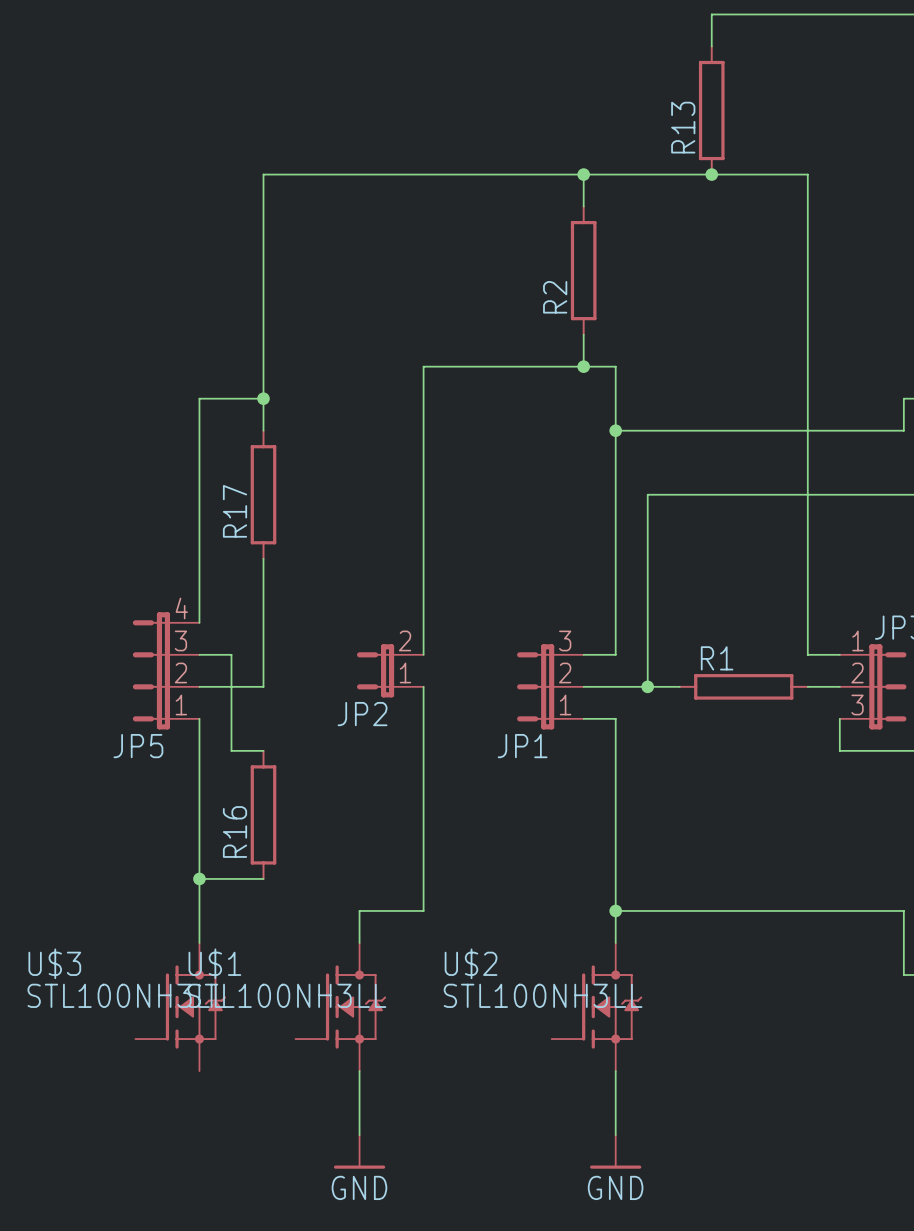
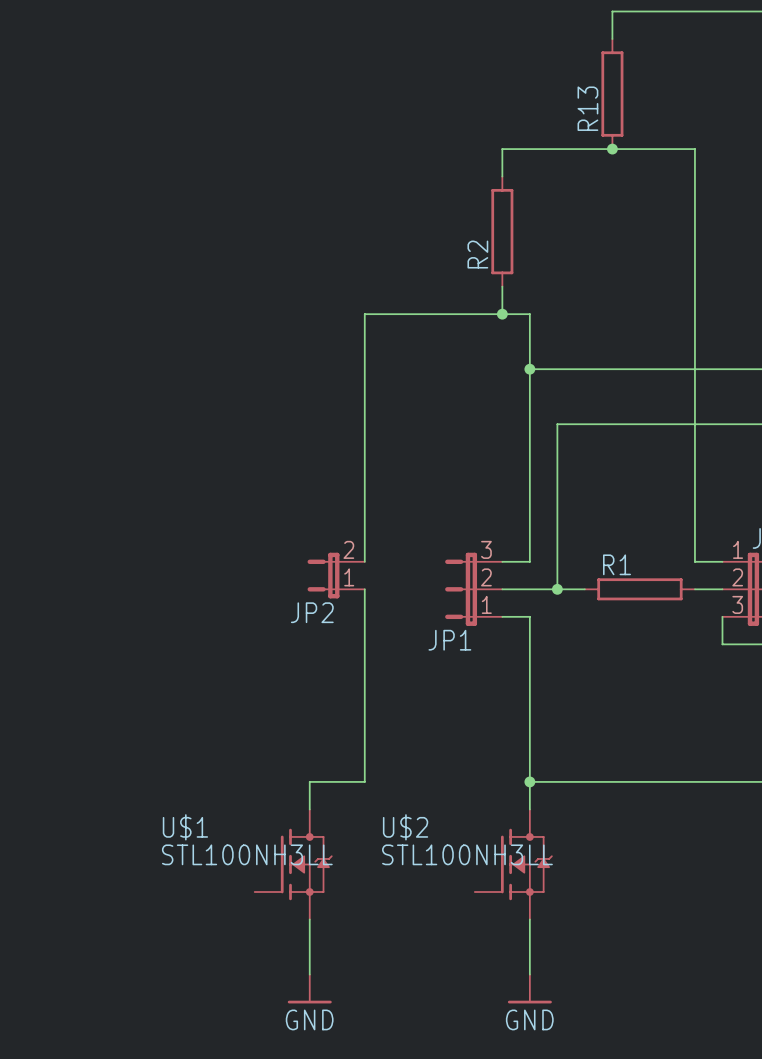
wire: (583, 174) (263, 174) (263, 430) -> none
junction: (583, 174) -> none
wire: (263, 398) (199, 398) (199, 622) -> none
junction: (263, 398) -> none
R17: (263, 494) -> none
wire: (263, 558) (263, 686) (199, 686) -> none
wire: (199, 654) (231, 654) (231, 750) (263, 750) -> none
JP5: (166, 670) -> none
wire: (199, 718) (199, 942) -> none
R16: (263, 814) -> none
wire: (199, 878) (263, 878) -> none
junction: (199, 878) -> none
U$3: STL100NH3LL (180, 1007) -> none

